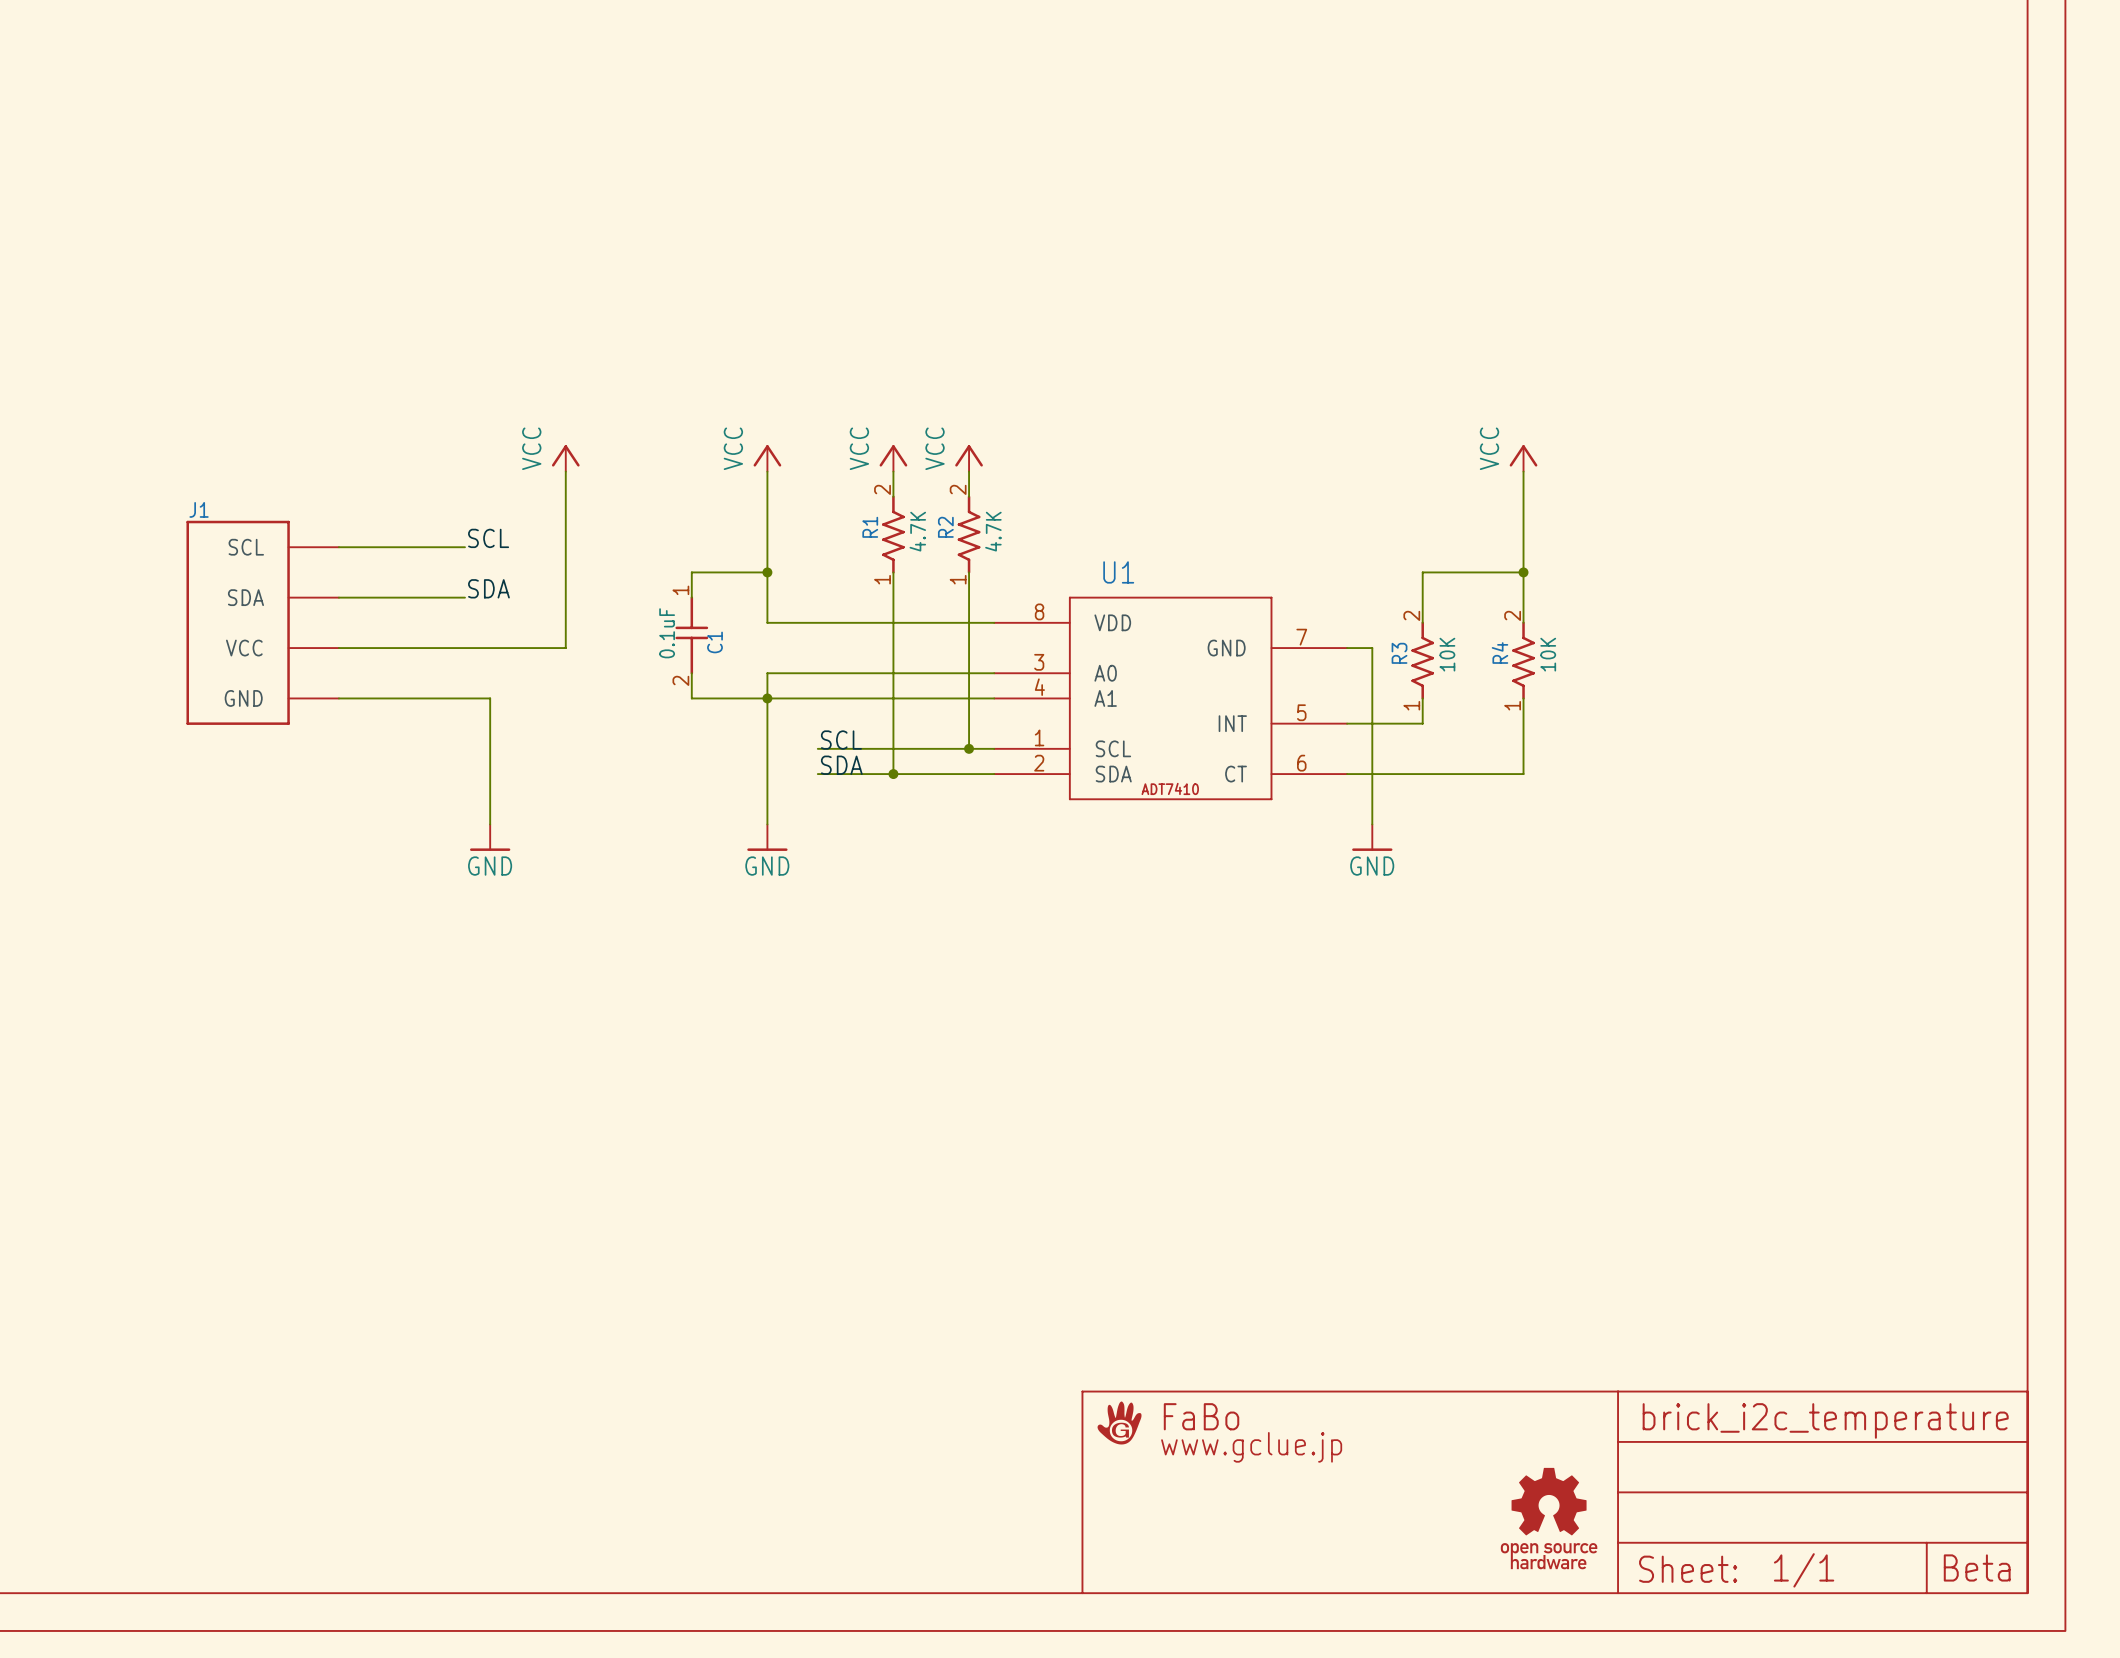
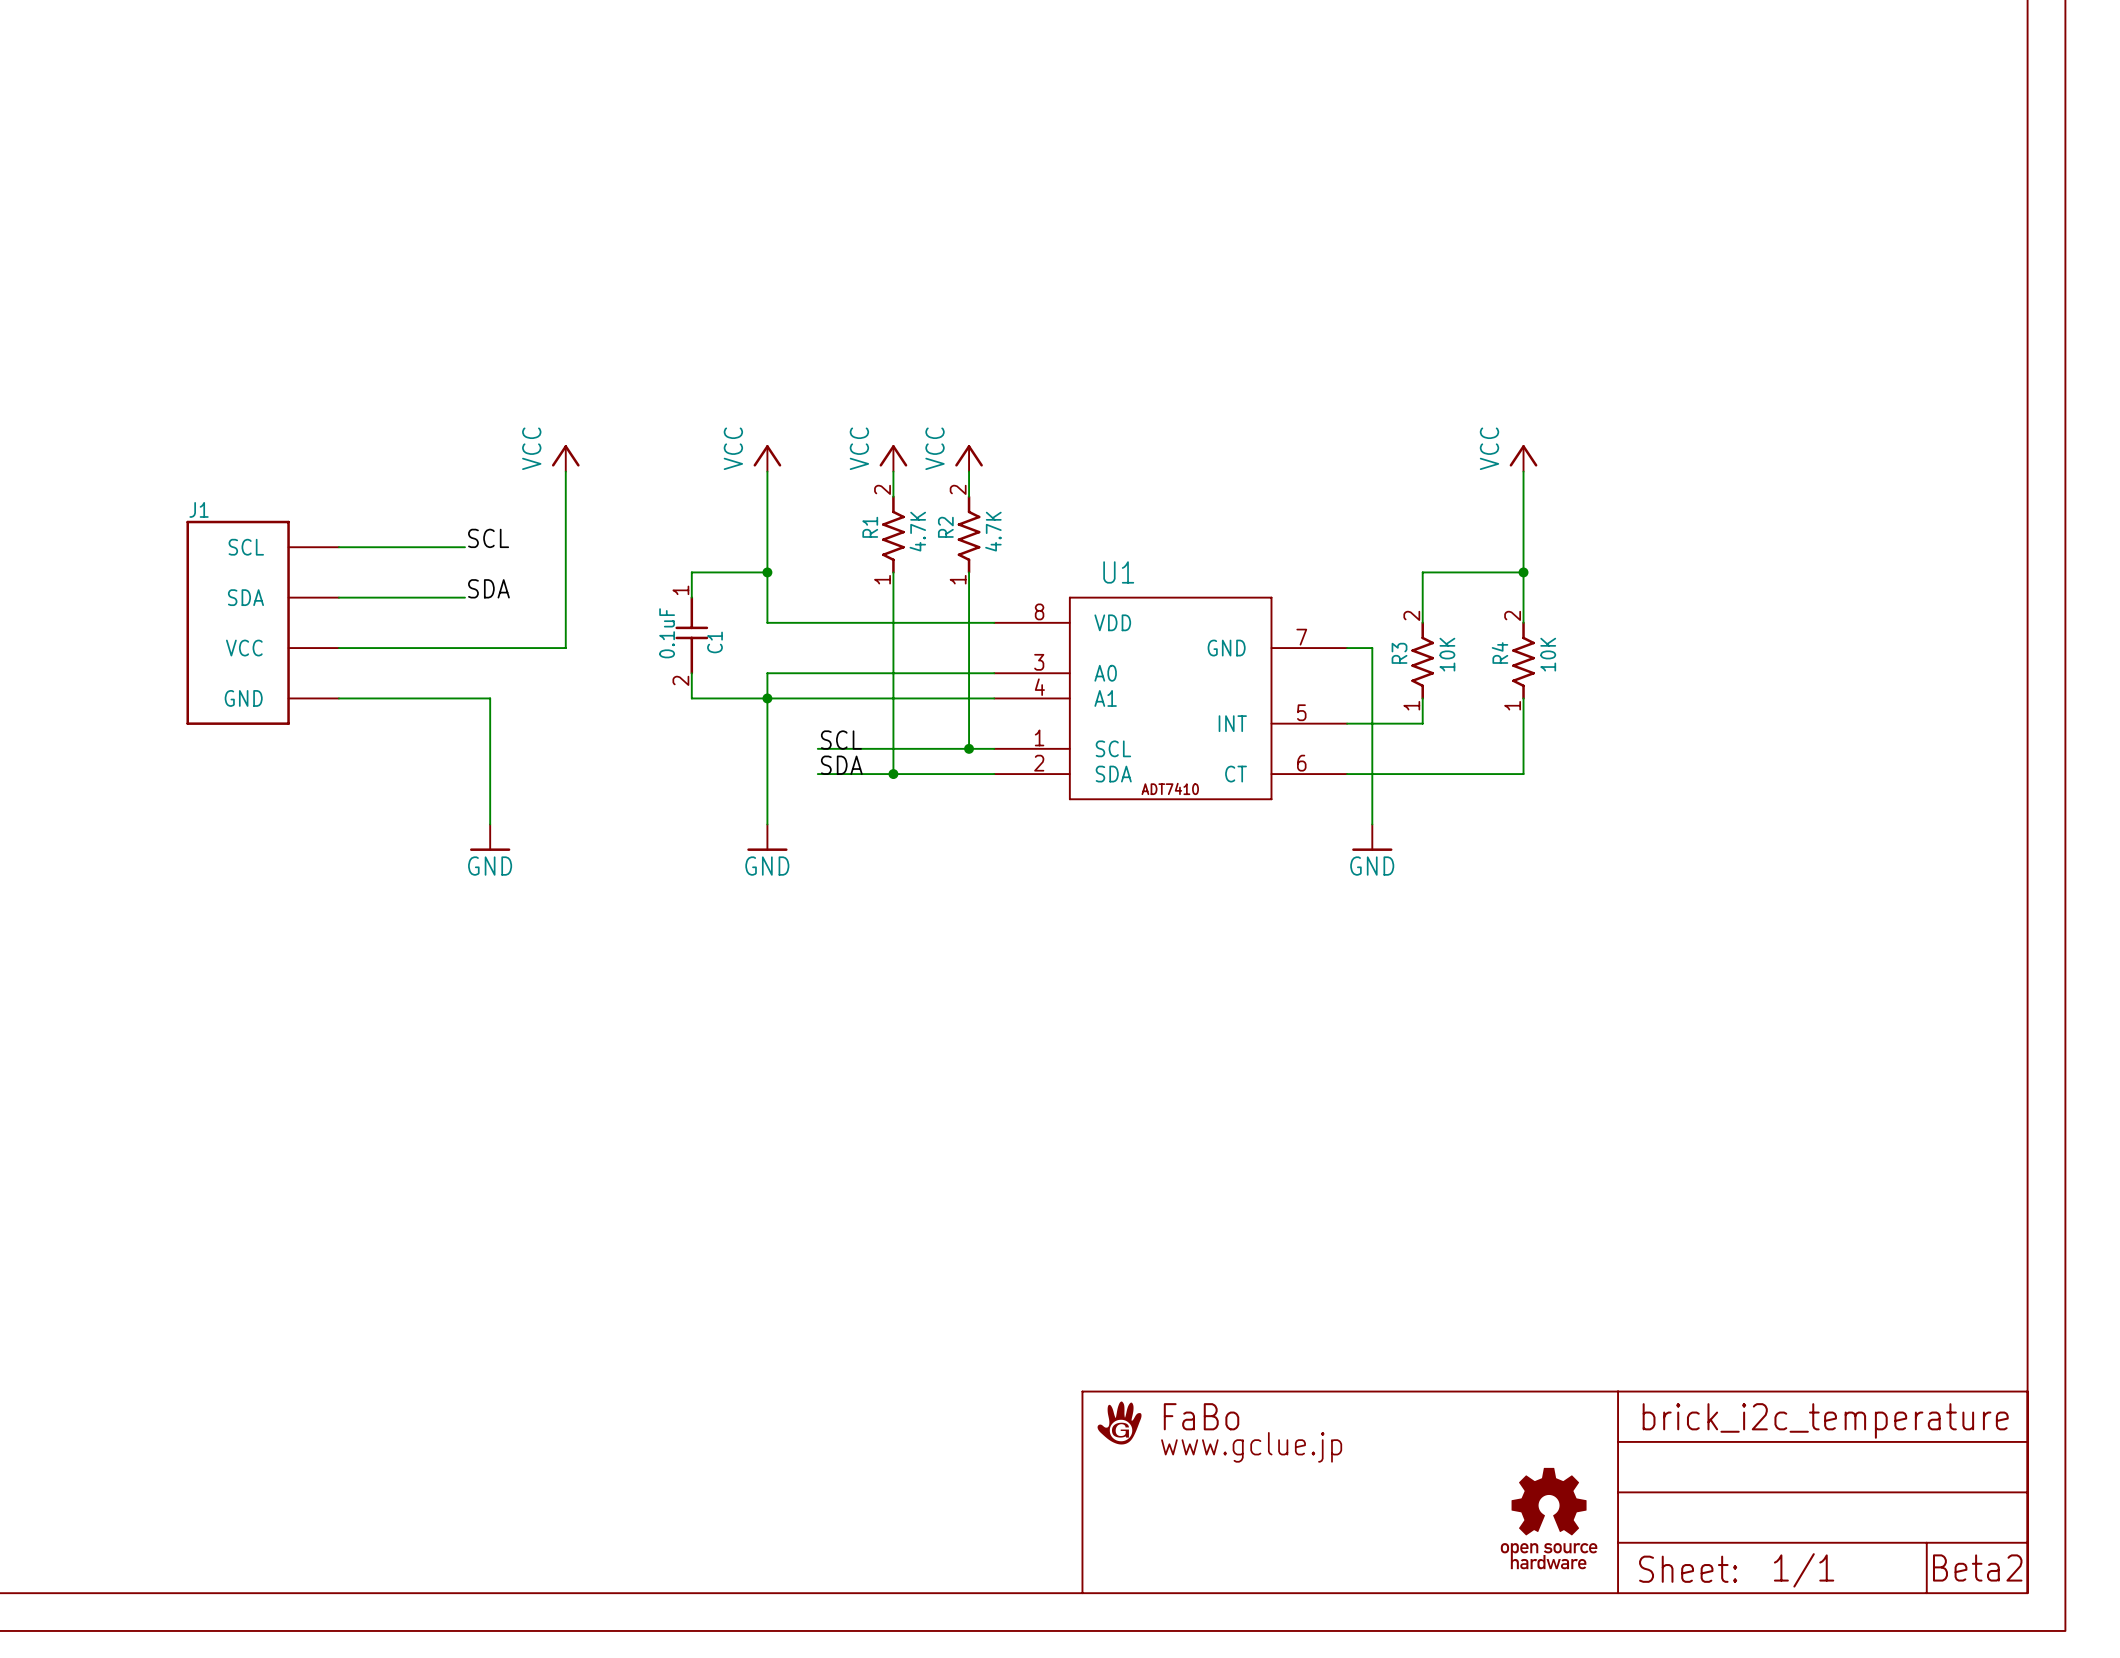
text: Beta (1977, 1567) -> Beta2 (1977, 1567)

